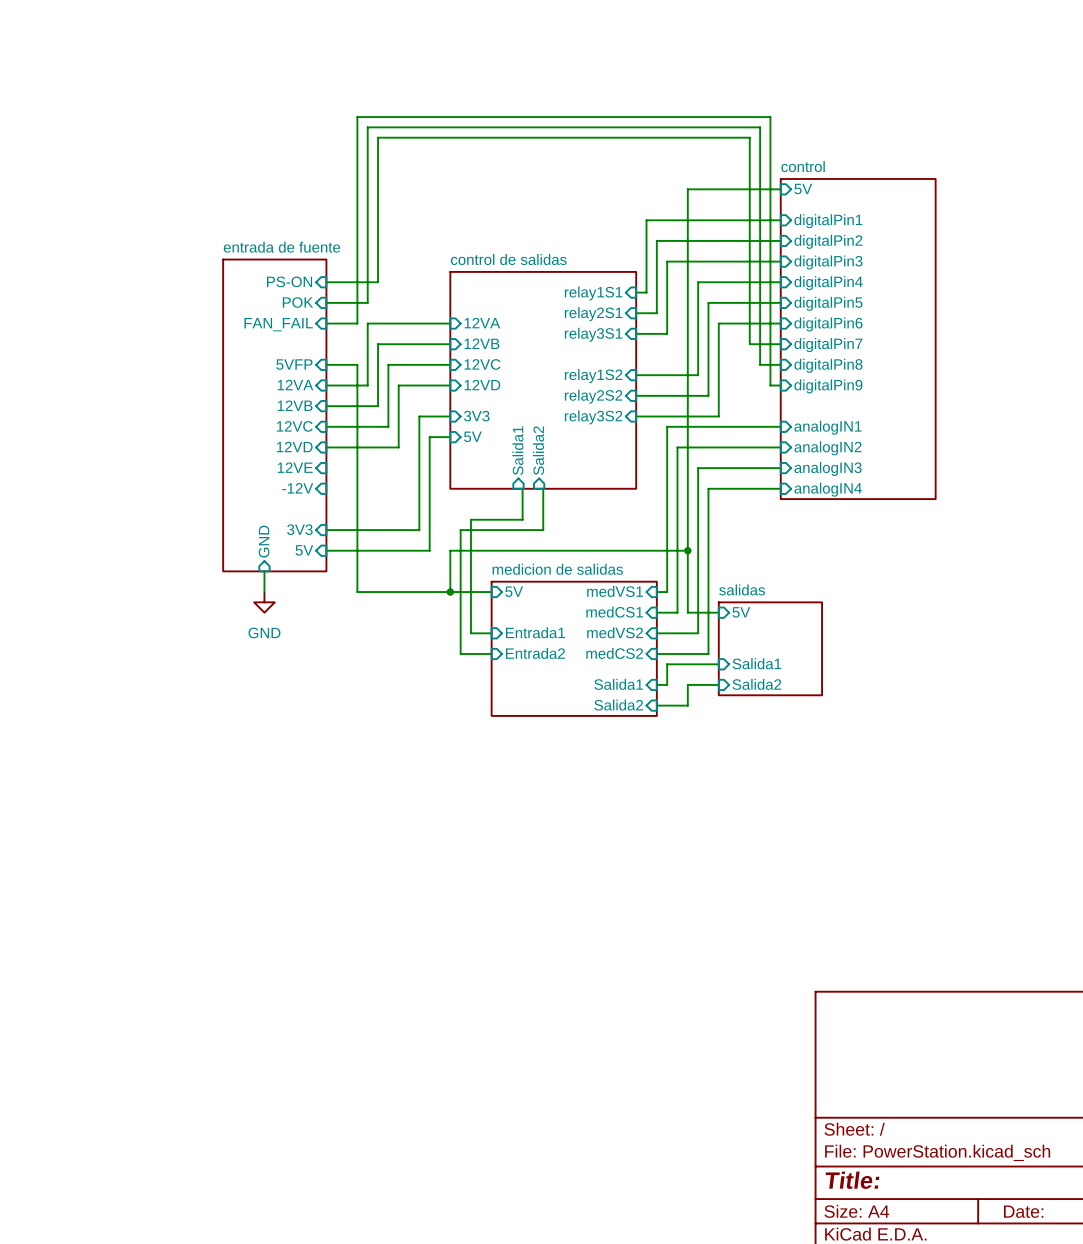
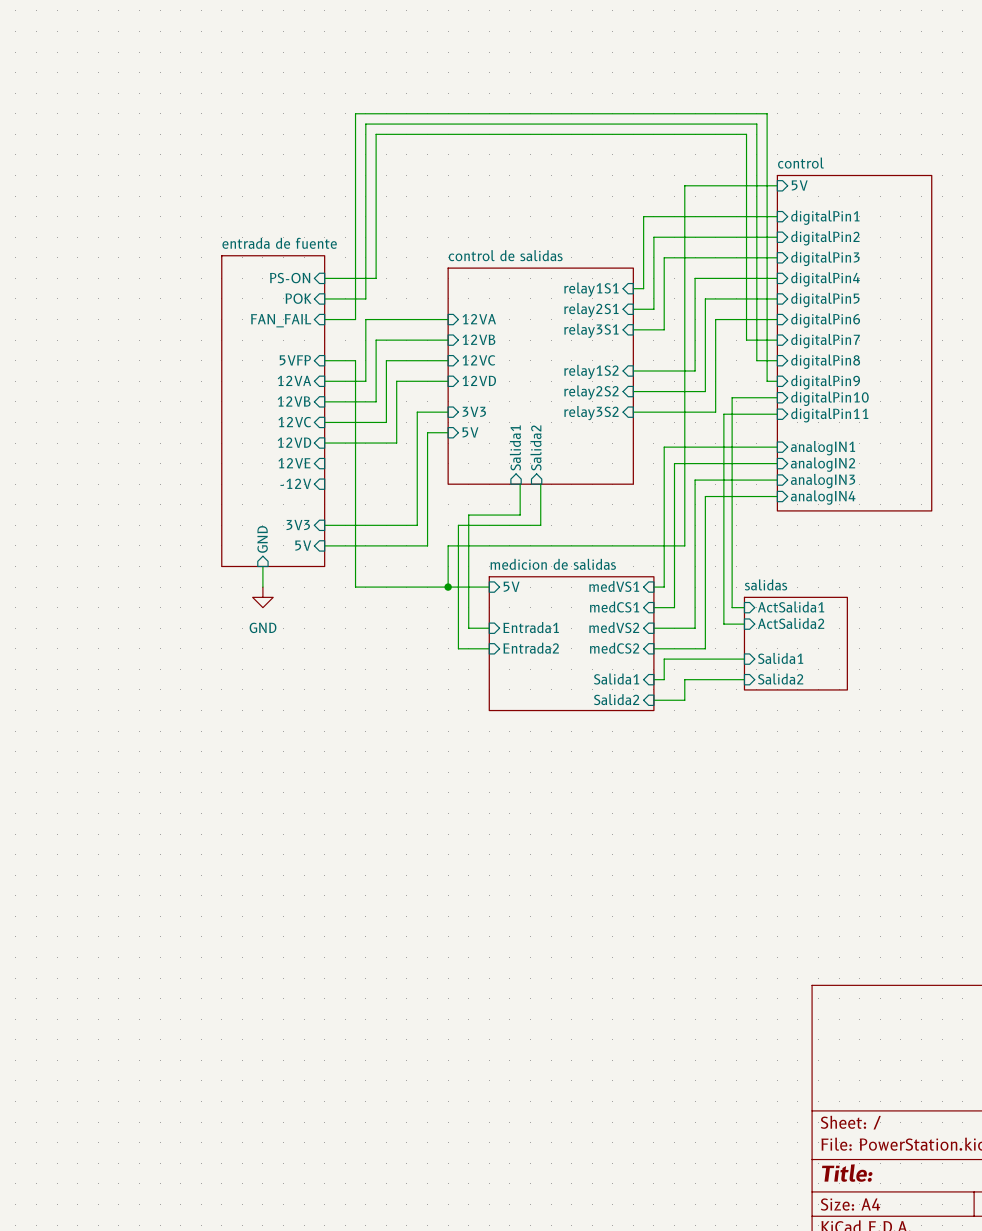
sheet control: (858, 339) -> none
sheet control: none -> (854, 343)
wire: none -> (777, 397) (732, 397) (732, 607) (744, 607)
sheet pin: none -> digitalPin10 (829, 398)
wire: none -> (777, 414) (723, 414) (723, 624) (744, 624)
sheet pin: none -> digitalPin11 (829, 415)
wire: (780, 426) (667, 426) (667, 451) -> (777, 447) (664, 447)
sheet pin position: analogIN1 (828, 427) -> analogIN1 (823, 448)
wire: (780, 447) (677, 447) (677, 468) -> none
sheet pin: analogIN2 (828, 448) -> none
wire: (698, 468) (698, 484) -> (695, 463) (674, 463)
sheet pin: analogIN3 (828, 469) -> analogIN2 (823, 464)
wire: none -> (695, 480) (777, 480)
sheet pin: none -> analogIN3 (823, 481)
wire: (780, 488) (708, 488) (708, 501) -> (777, 496) (705, 496)
sheet pin position: analogIN4 (828, 489) -> analogIN4 (823, 497)
wire: (687, 550) (687, 612) (718, 612) -> none
junction: (687, 550) -> none
sheet pin: 5V (741, 612) -> none
sheet pin: none -> ActSalida1 (791, 606)
sheet pin: none -> ActSalida2 (791, 623)
sheet salidas position: (770, 648) -> (795, 643)
sheet pin position: Salida1 (756, 663) -> Salida1 (780, 658)
wire: none -> (715, 659) (744, 659)
wire: none -> (715, 679) (744, 679)
sheet pin position: Salida2 (756, 684) -> Salida2 (780, 679)

